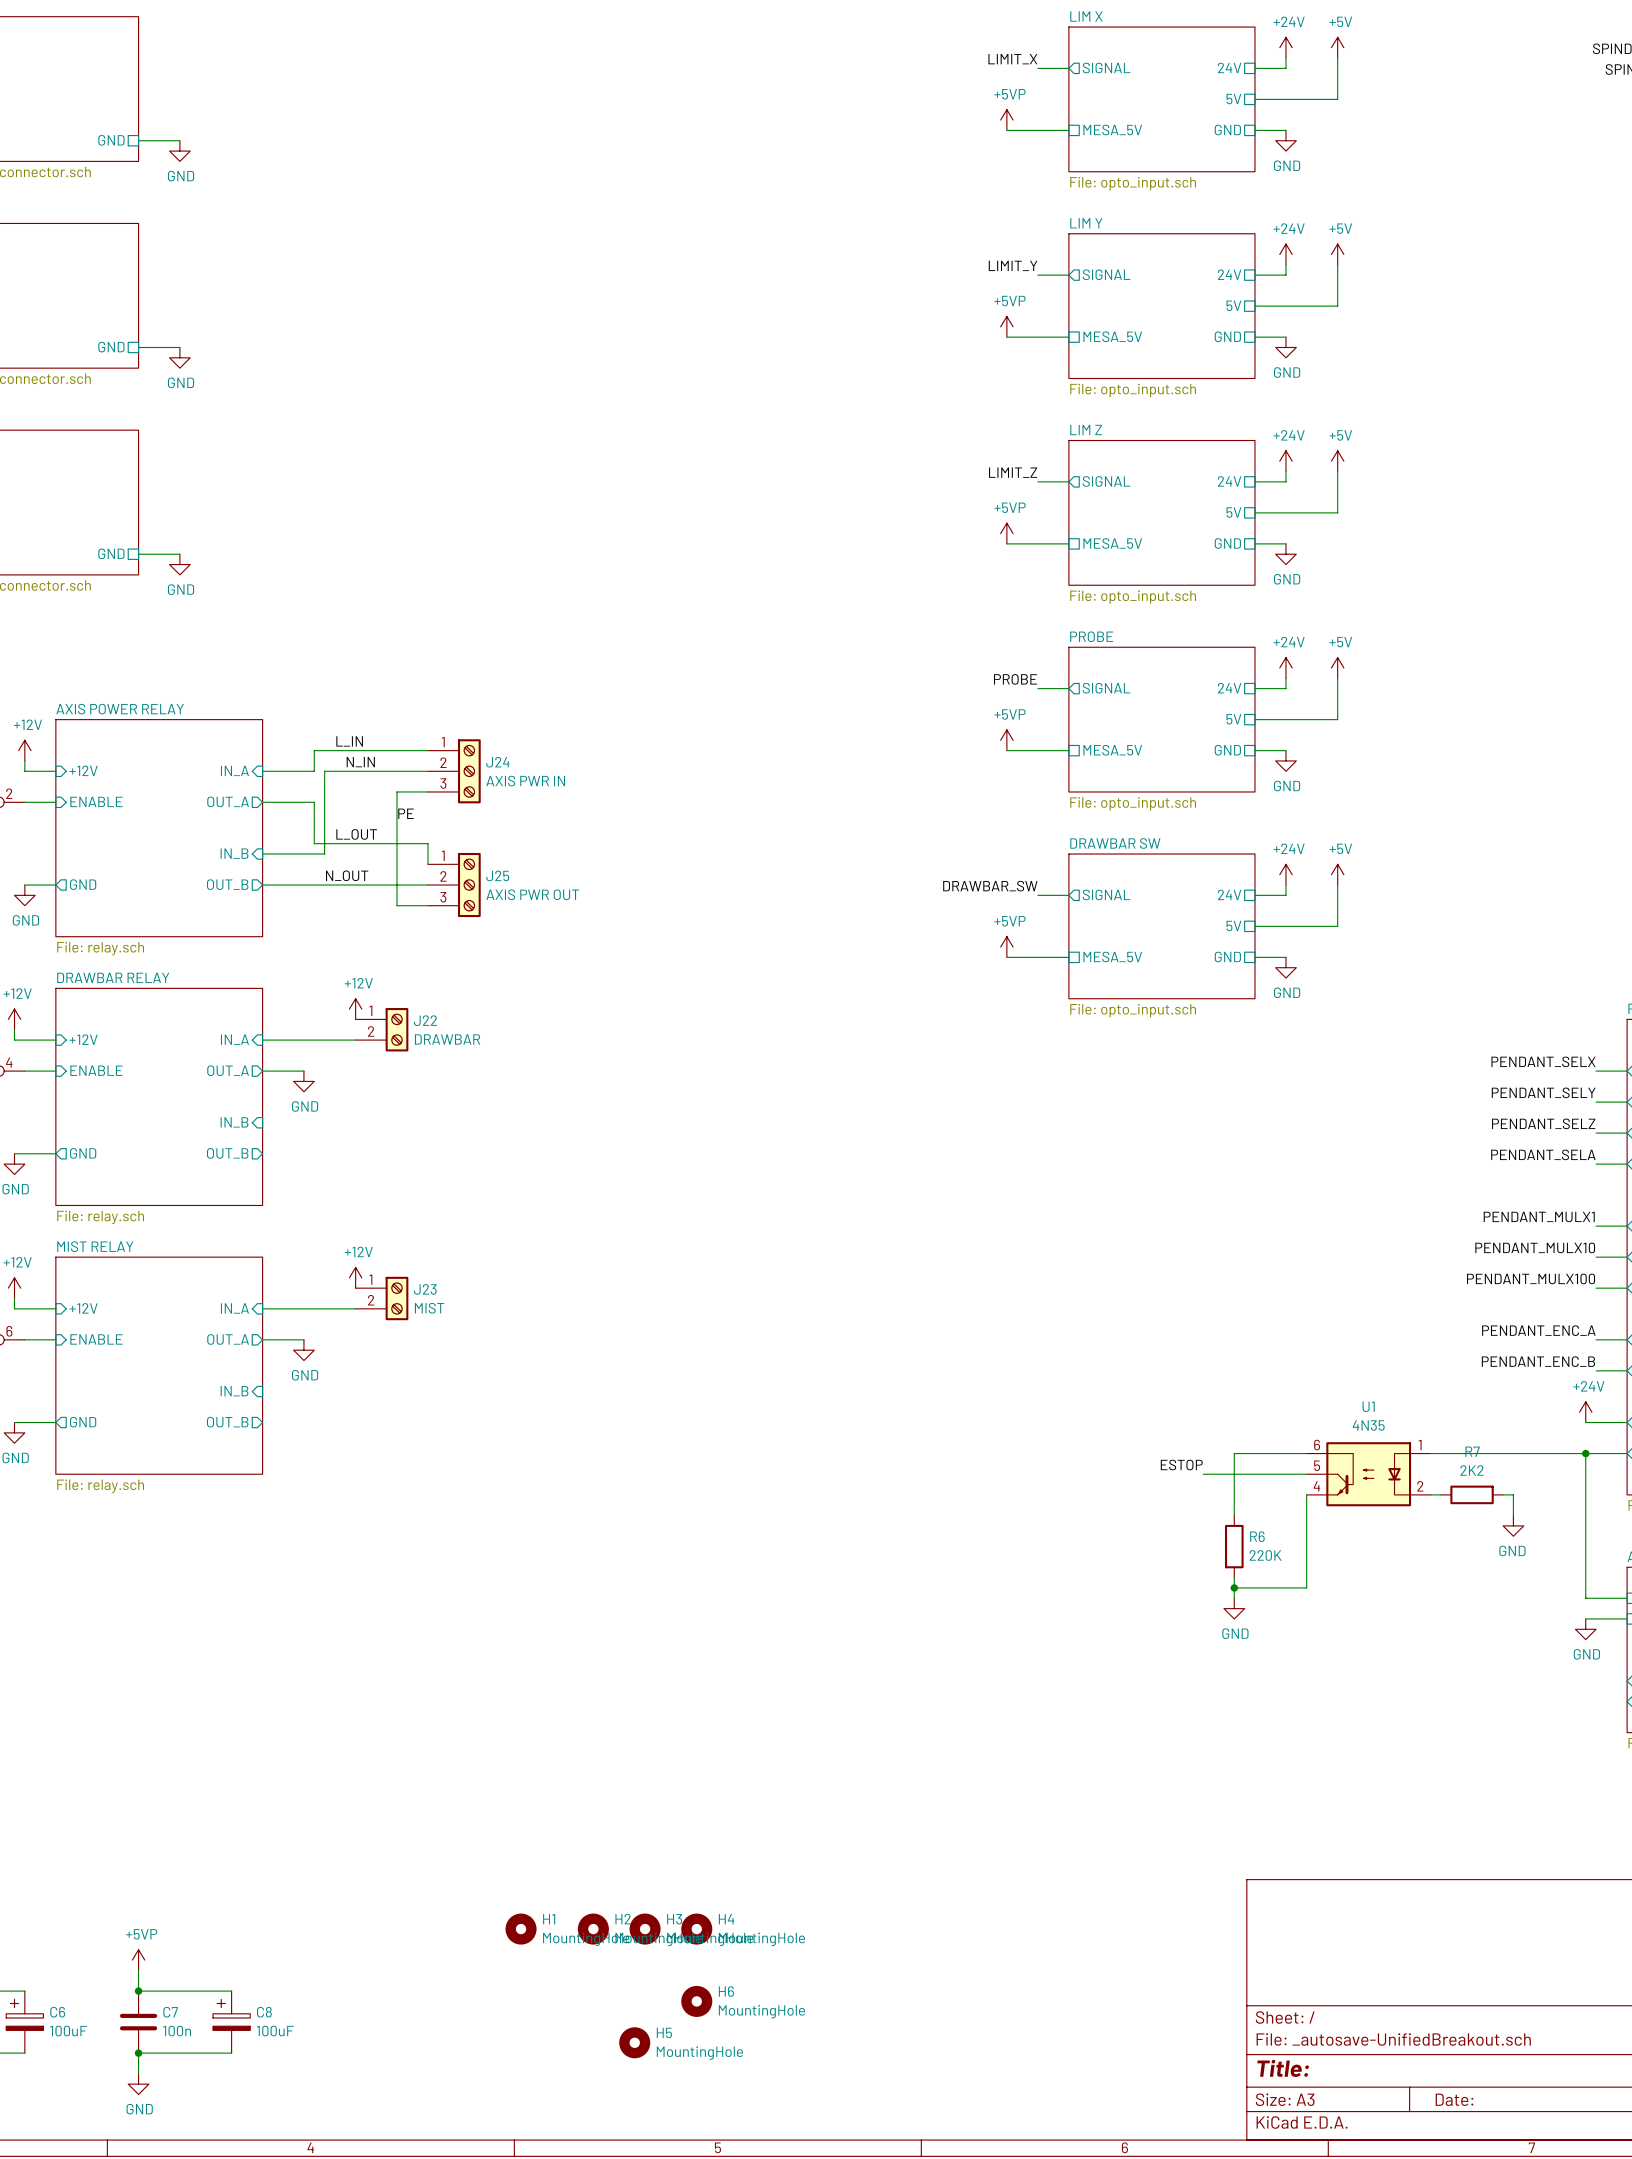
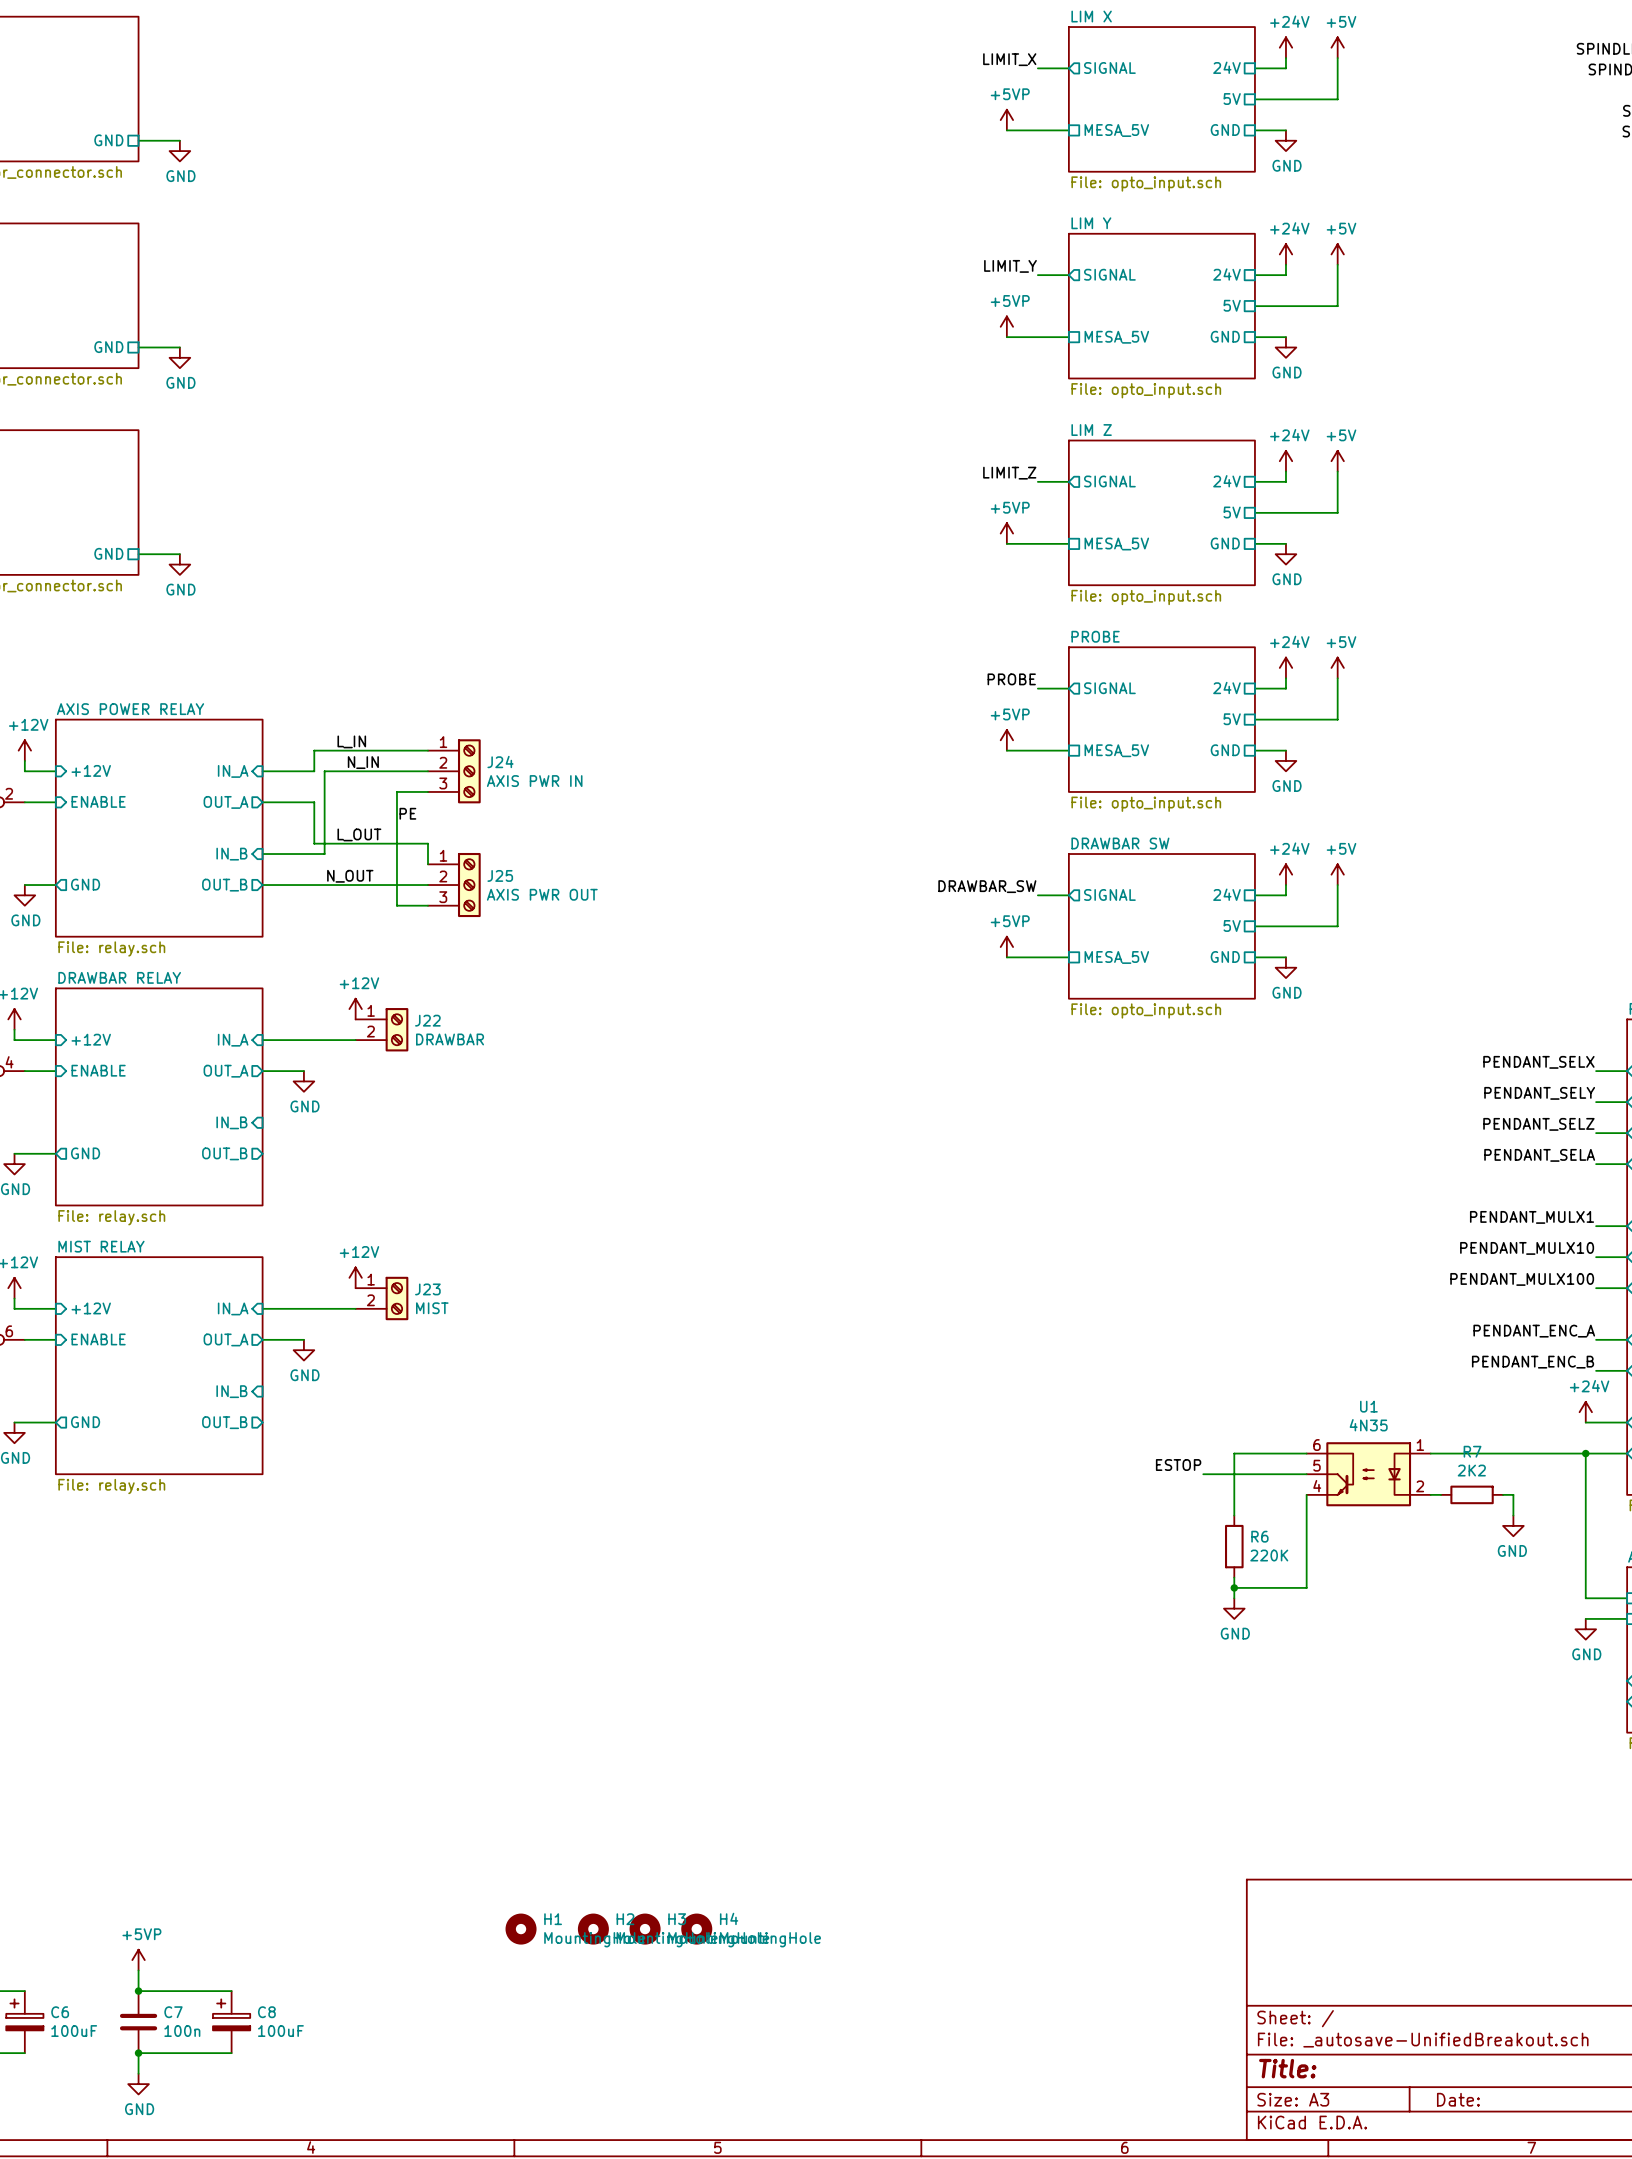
H6: MountingHole (696, 2001) -> none
H5: MountingHole (634, 2042) -> none

